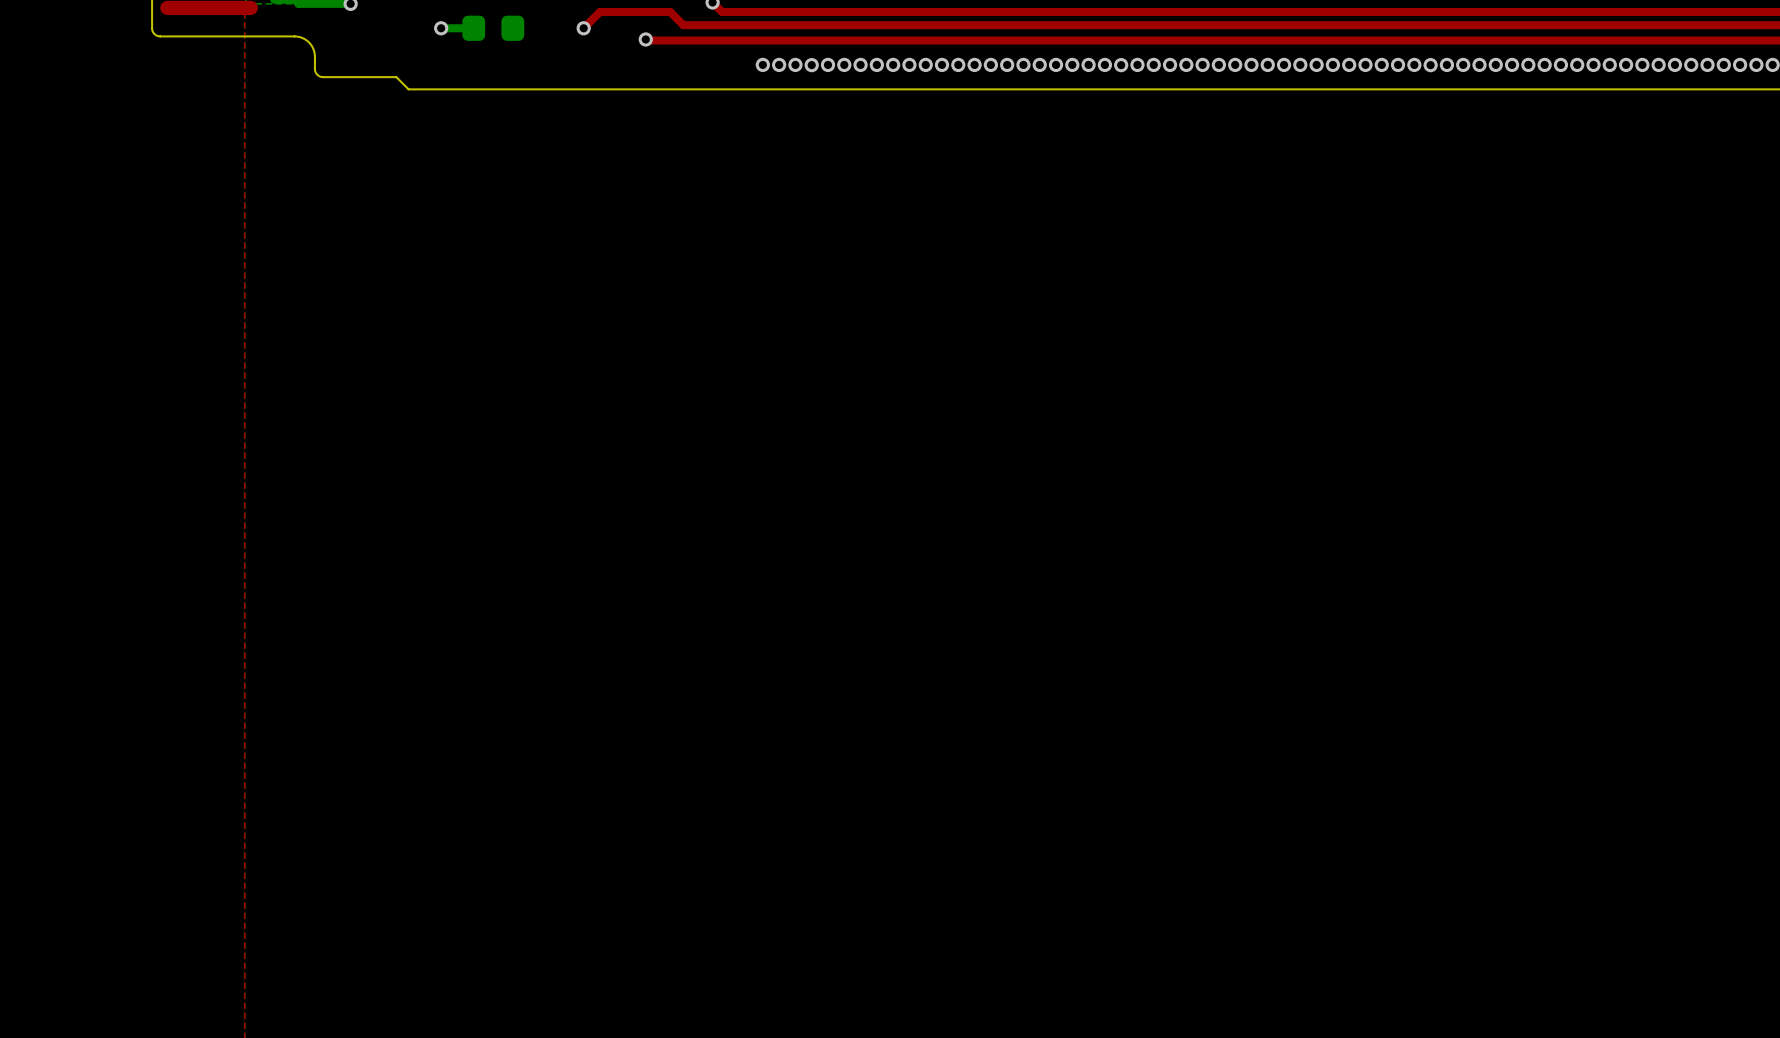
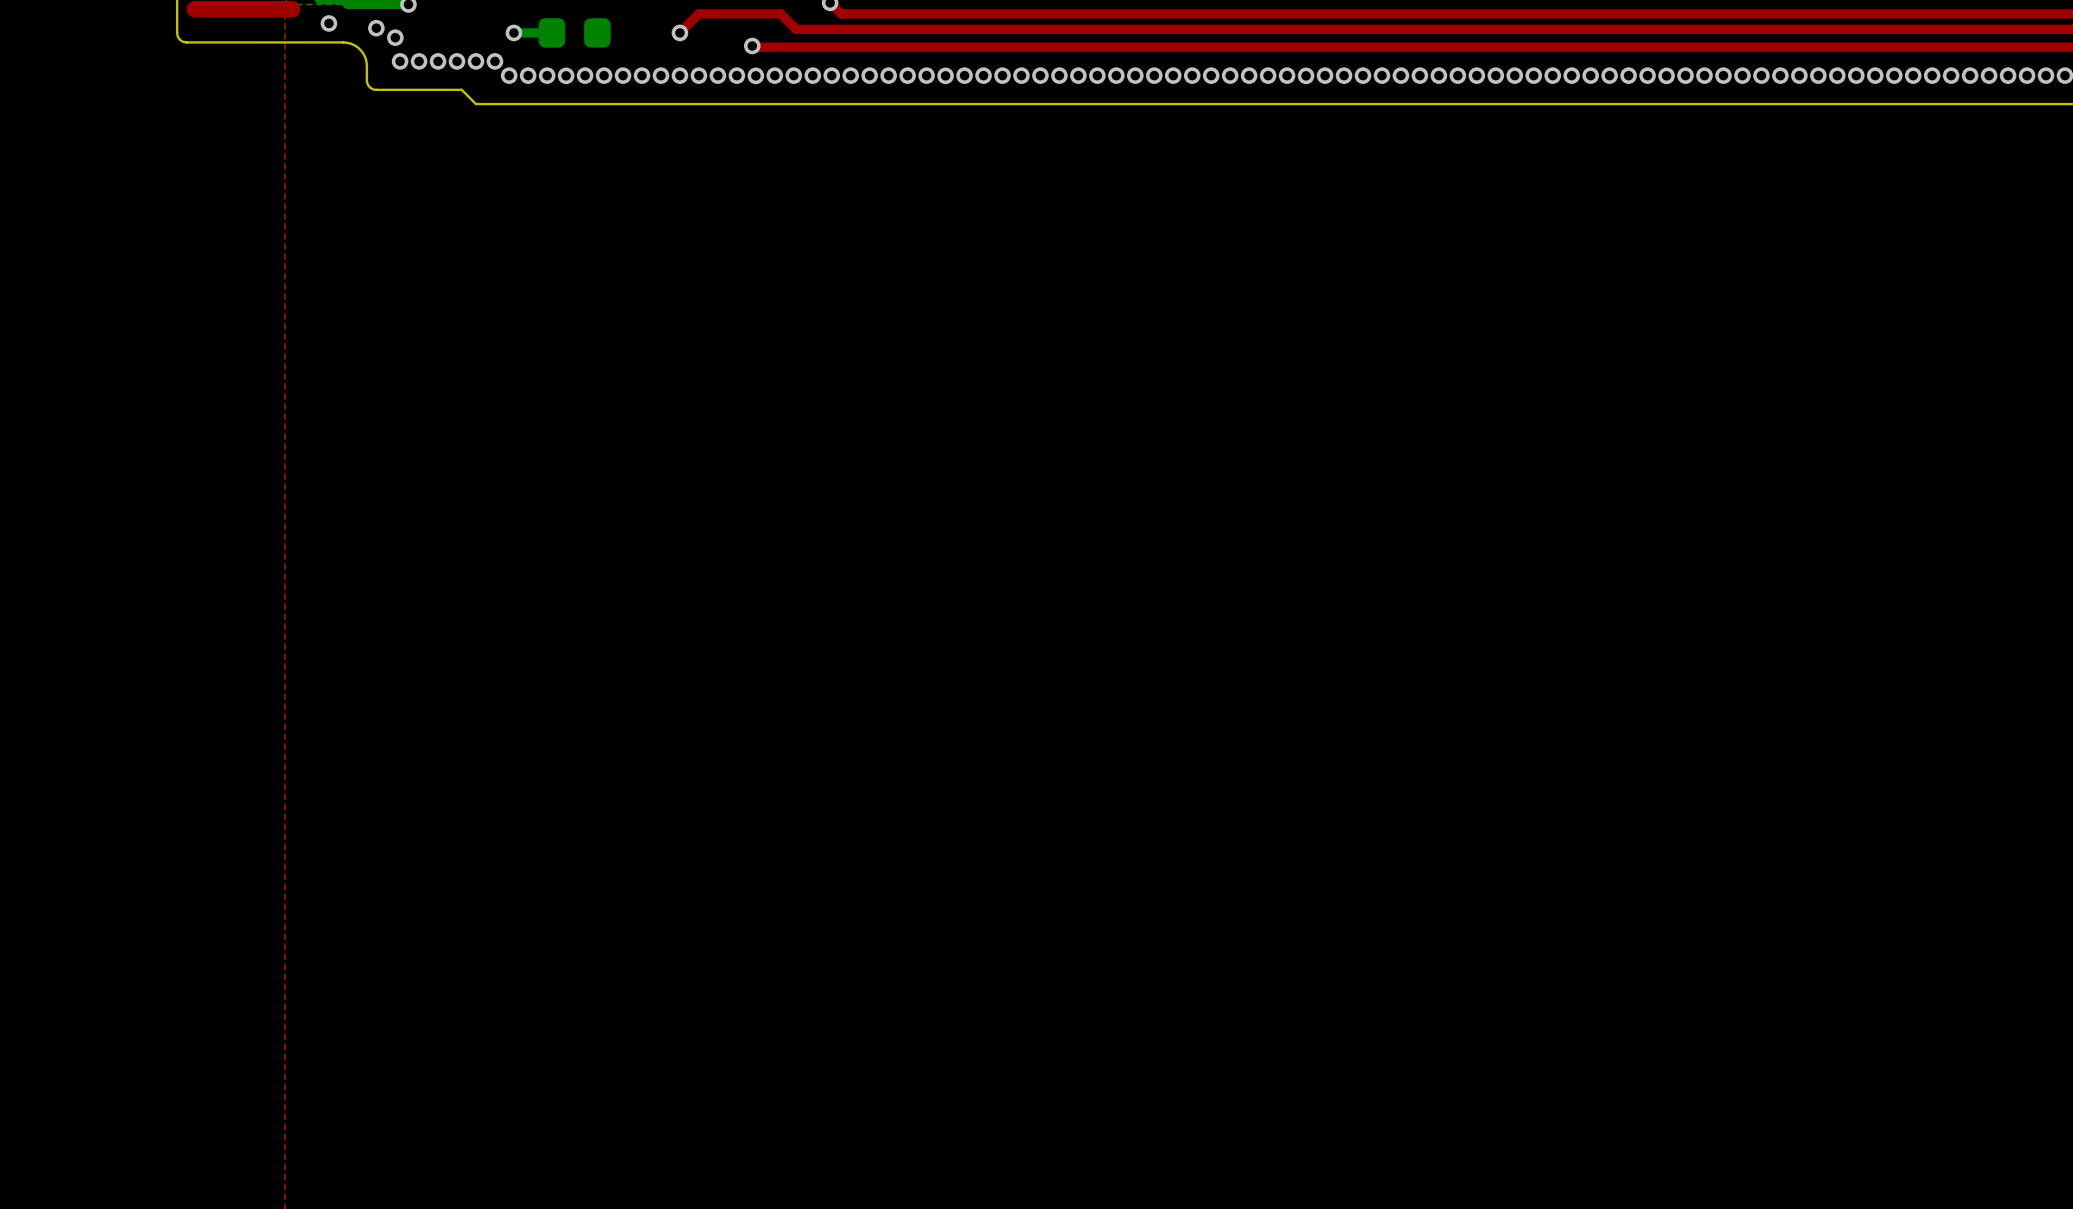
via: none -> (328, 23)
via: none -> (376, 28)
via: none -> (395, 37)
via: none -> (400, 61)
via: none -> (419, 61)
via: none -> (438, 61)
via: none -> (457, 61)
via: none -> (475, 61)
via: none -> (494, 61)
via: none -> (509, 75)
via: none -> (528, 75)
via: none -> (547, 75)
via: none -> (585, 75)
via: none -> (604, 75)
via: none -> (623, 75)
via: none -> (642, 75)
via: none -> (660, 75)
via: none -> (679, 75)
via: none -> (698, 75)
via: none -> (717, 75)
via: none -> (736, 75)
via: none -> (774, 75)
via: none -> (793, 75)
via: none -> (812, 75)
via: none -> (831, 75)
via: none -> (850, 75)
via: none -> (869, 75)
via: none -> (566, 75)
via: none -> (755, 75)

